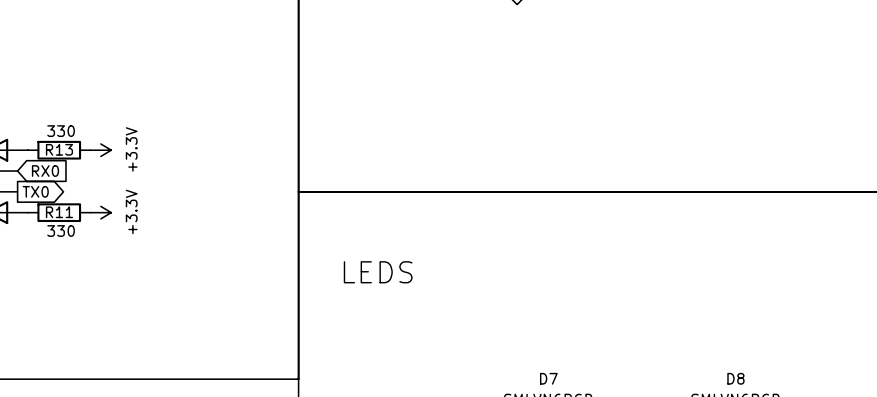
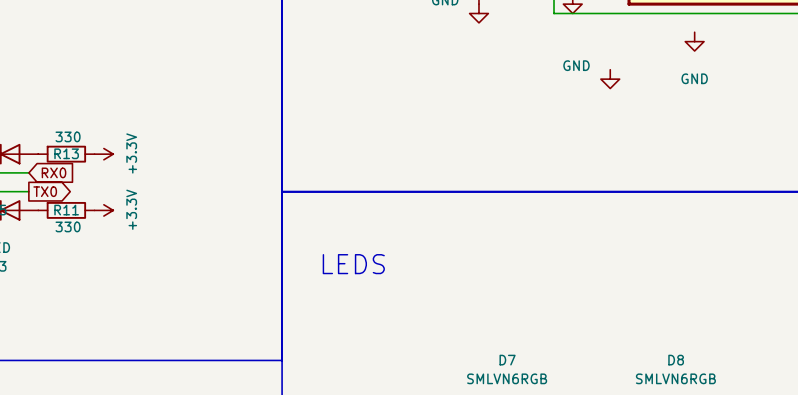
power symbol: none -> GND (694, 41)
power symbol: none -> GND (610, 79)

